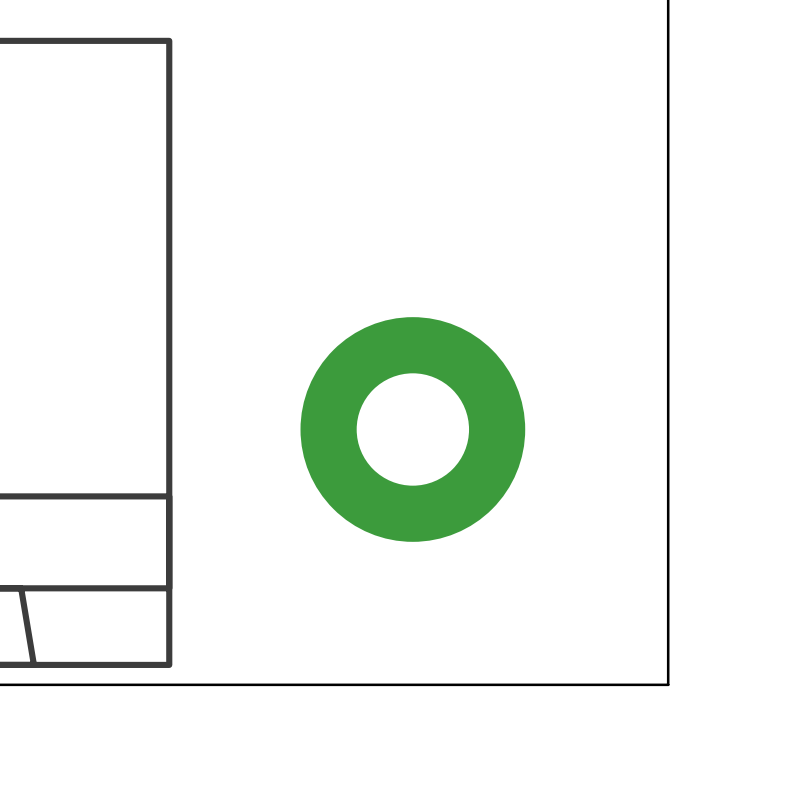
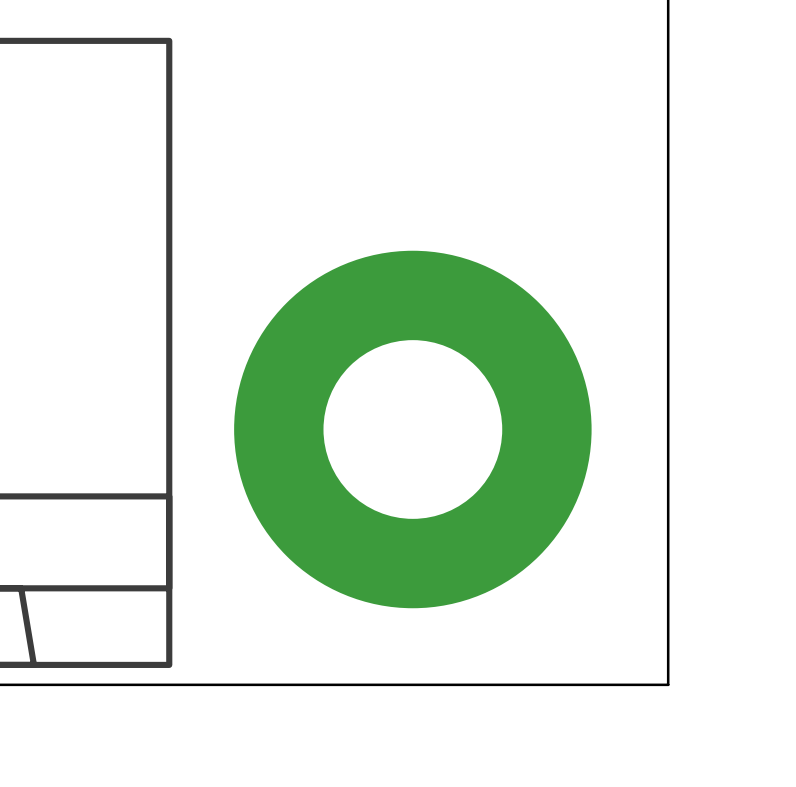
part footprint: [300, 317, 526, 542] -> [234, 250, 592, 609]

